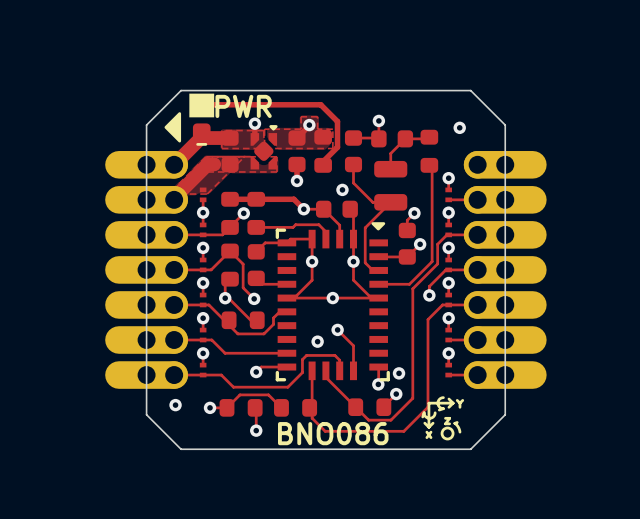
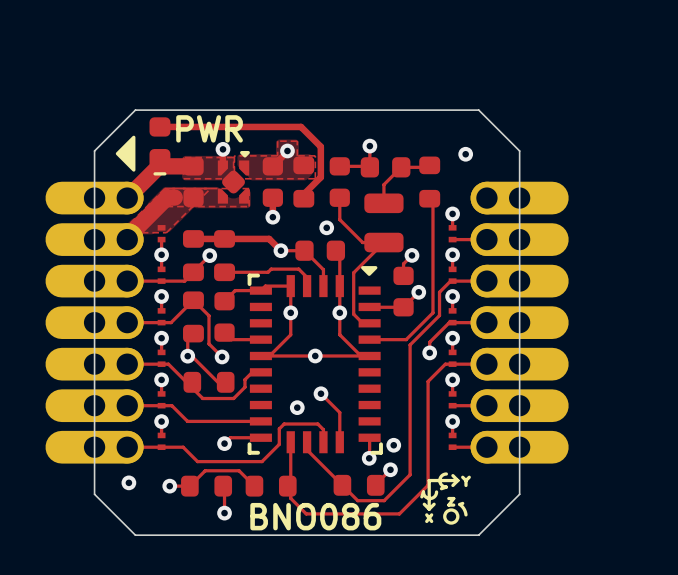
drawing: [189, 93, 215, 118] -> none

